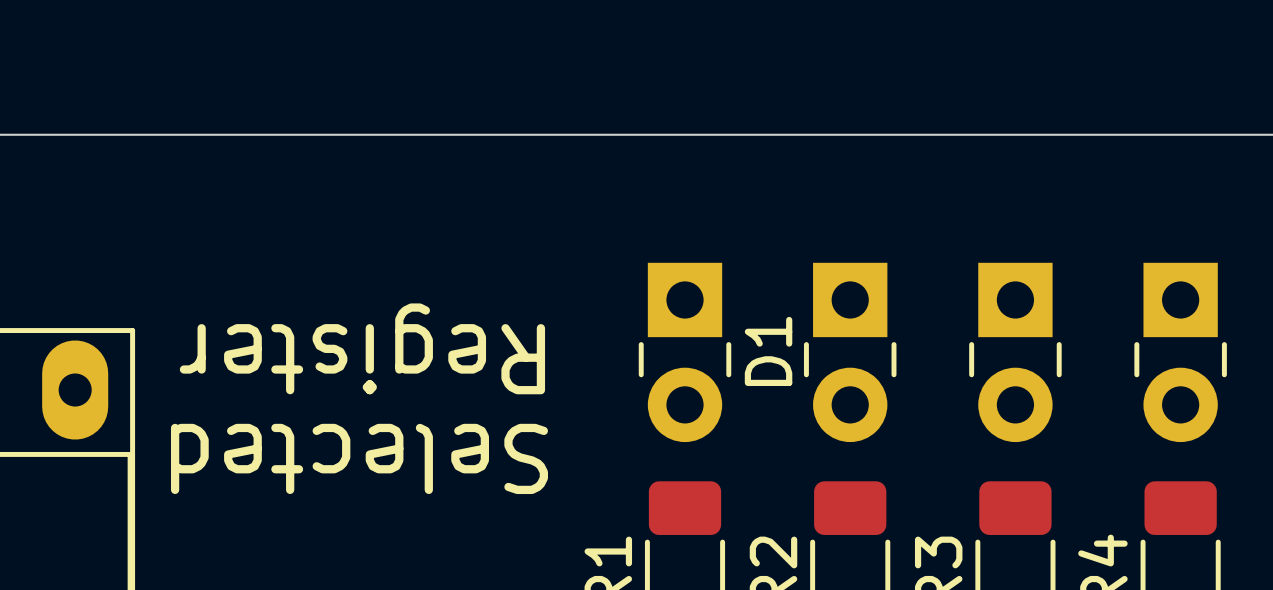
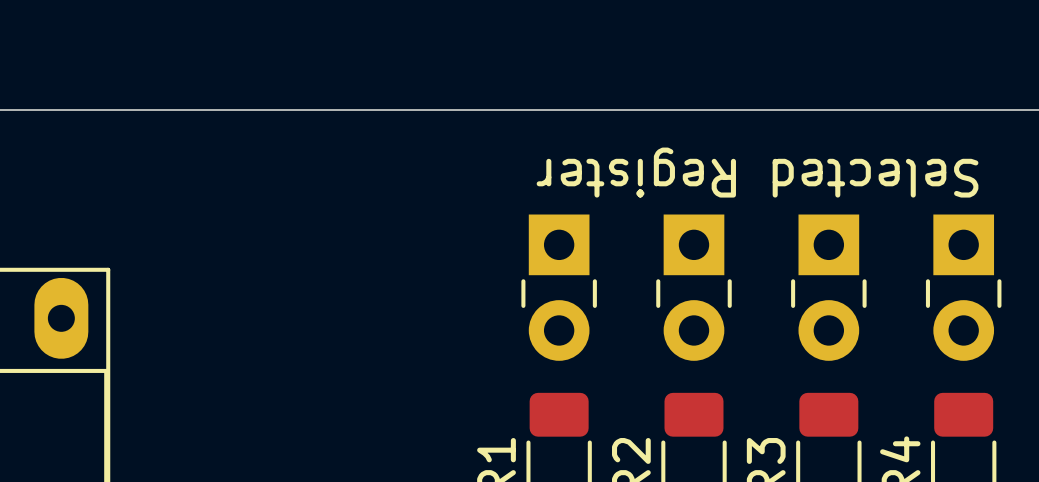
text: none -> Selected Register (757, 172)
text: Register (362, 348) -> none
D1 name: D1 (768, 351) -> none
text: Selected (359, 458) -> none

